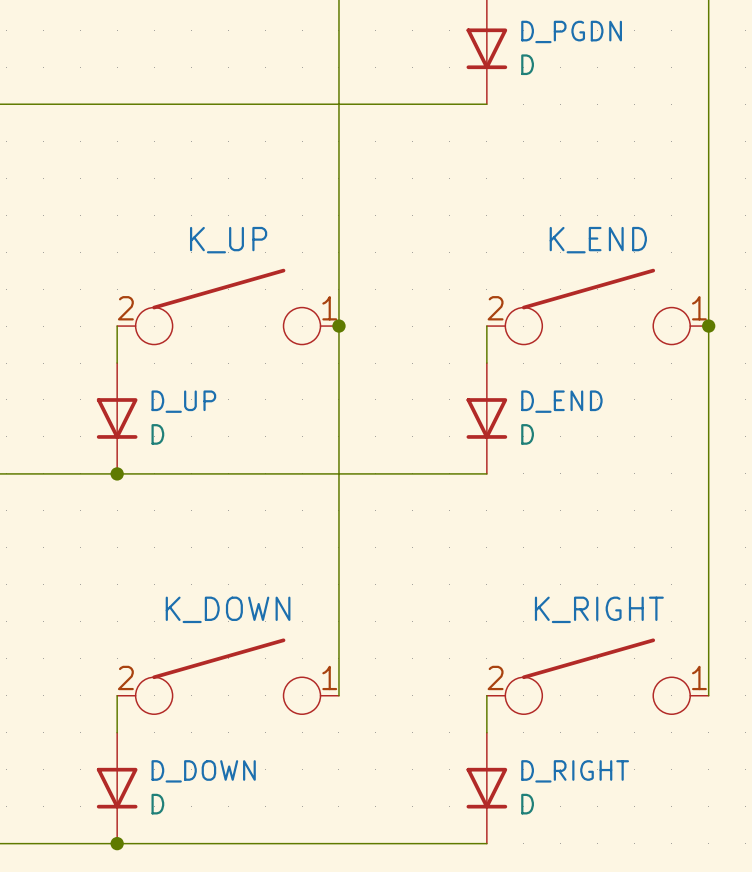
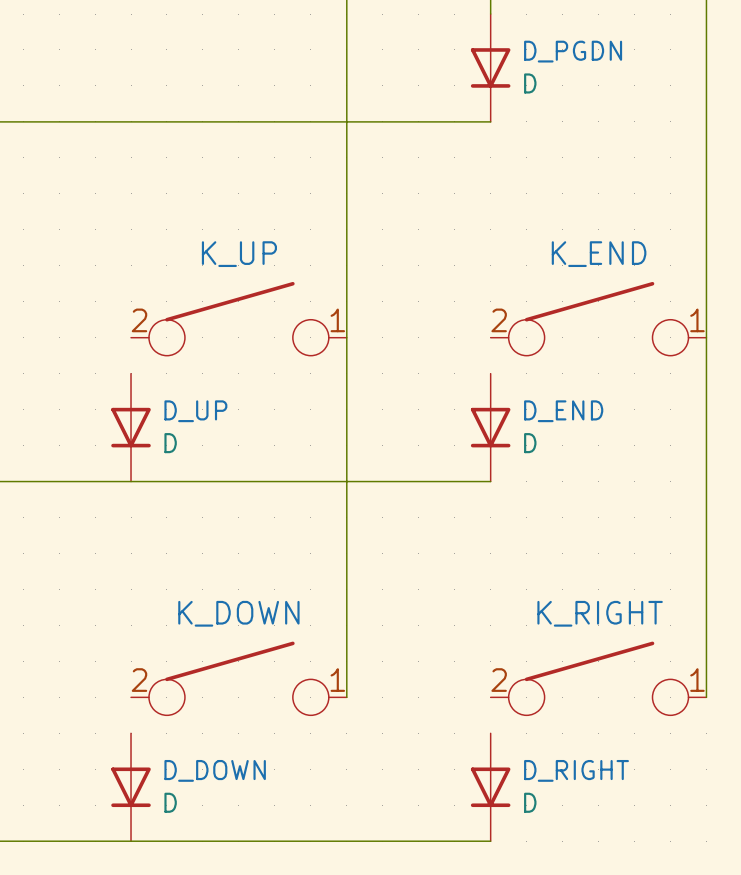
wire: (117, 326) (117, 363) -> none
junction: (338, 326) -> none
wire: (486, 326) (486, 363) -> none
junction: (708, 326) -> none
junction: (117, 473) -> none
wire: (117, 695) (117, 732) -> none
wire: (486, 695) (486, 732) -> none
junction: (117, 843) -> none

